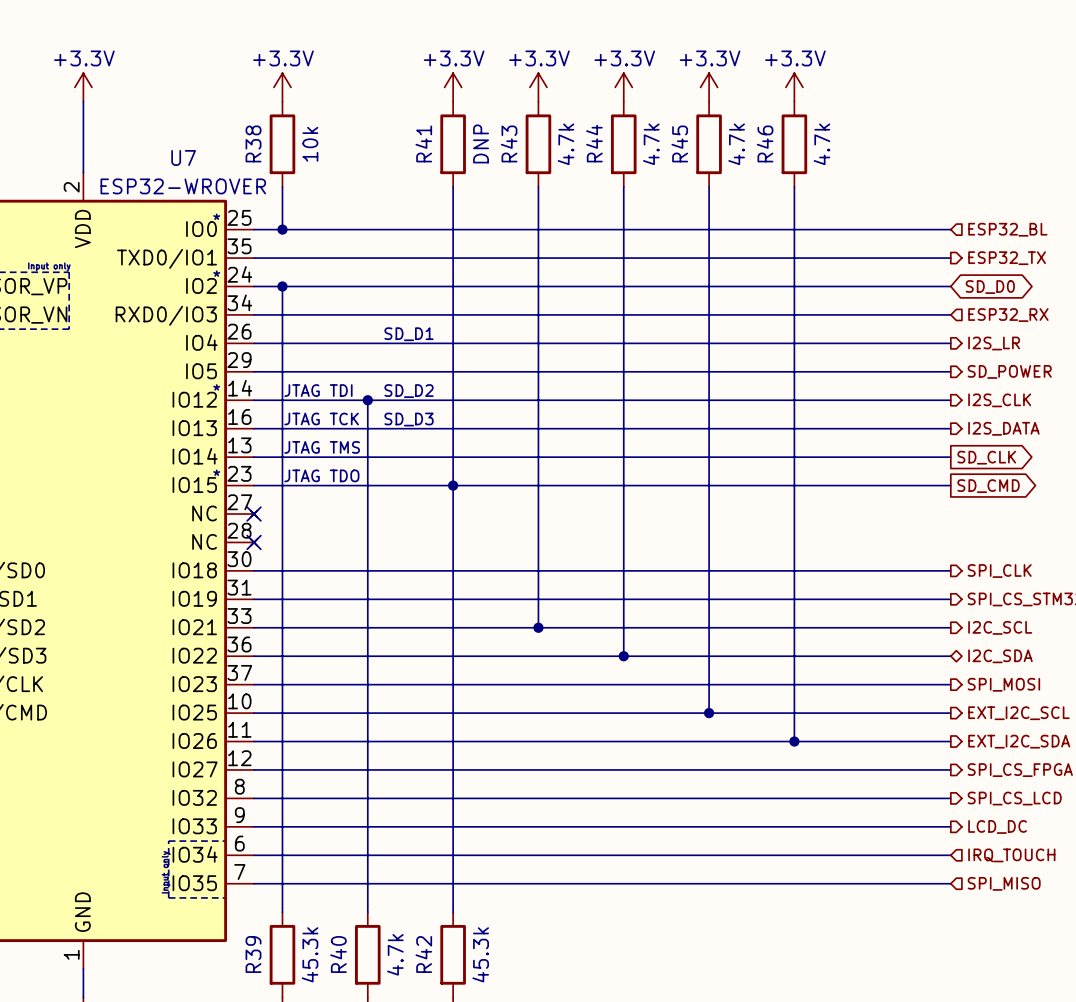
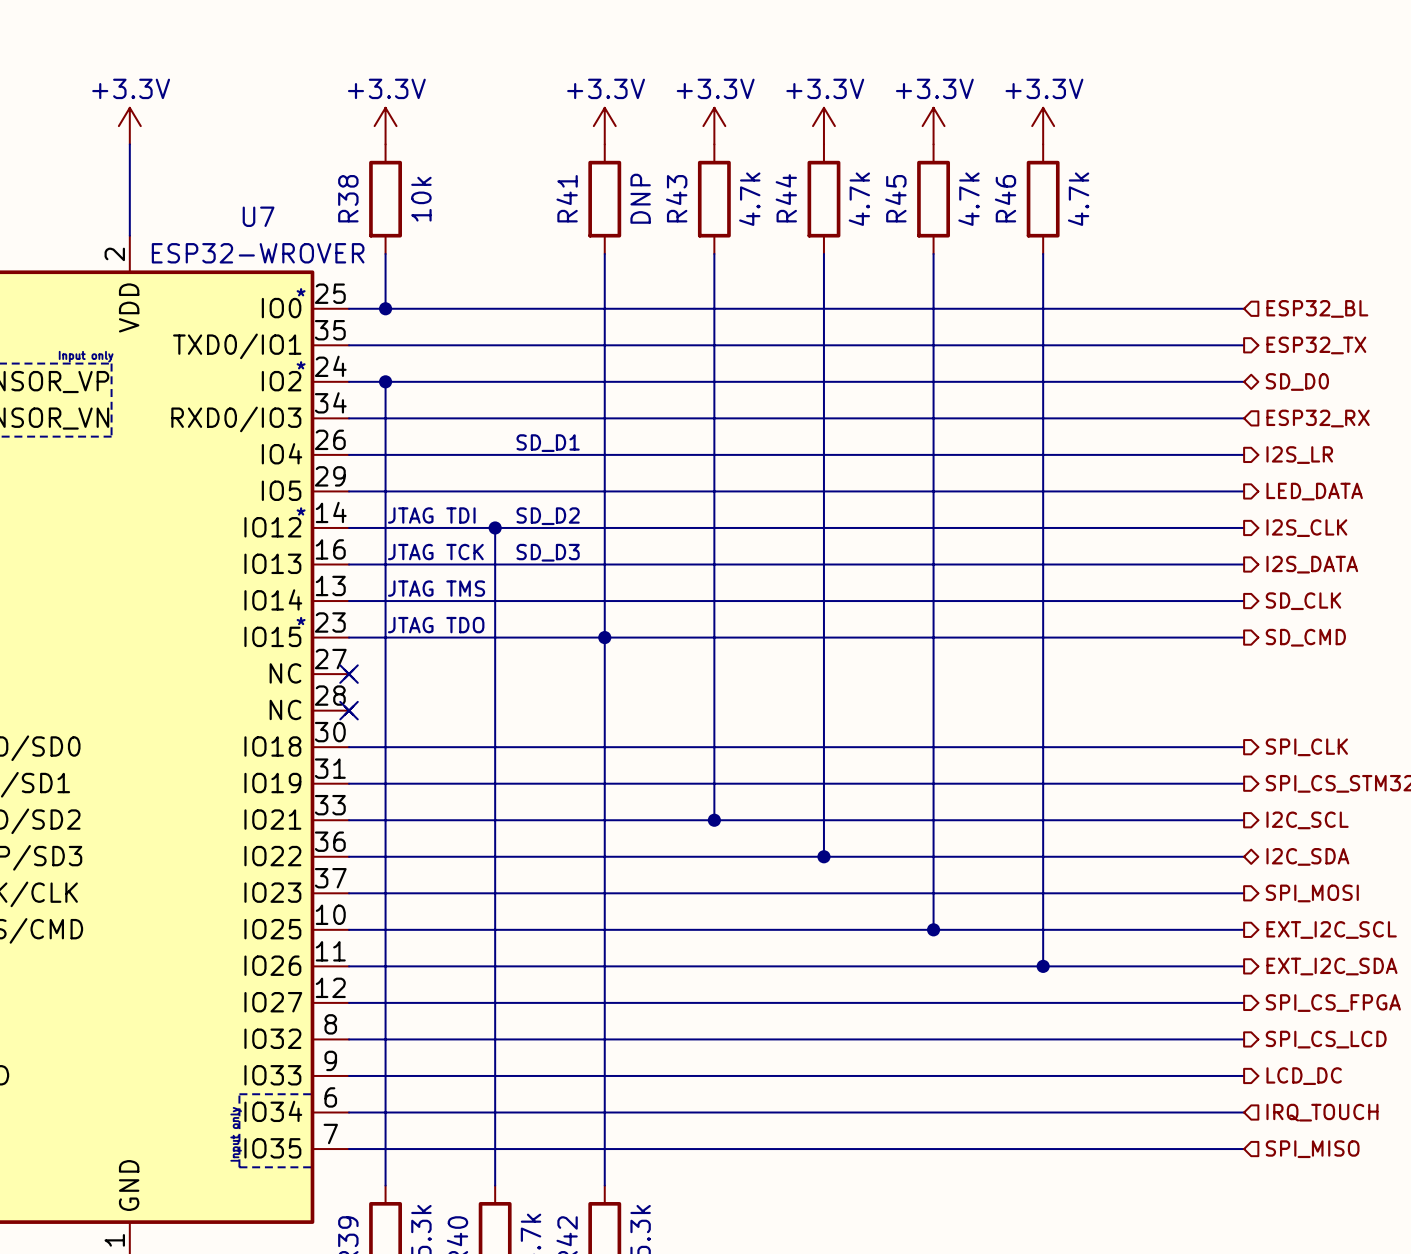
hierarchical label: none -> SD_D0 (1297, 381)
global label: SD_D0 (990, 287) -> none
hierarchical label: SD_POWER (1009, 371) -> LED_DATA (1314, 491)
global label: SD_CLK (986, 457) -> none
hierarchical label: none -> SD_CLK (1303, 601)
hierarchical label: none -> SD_CMD (1305, 637)
global label: SD_CMD (988, 486) -> none

